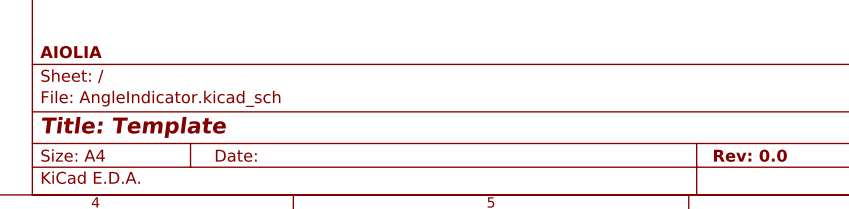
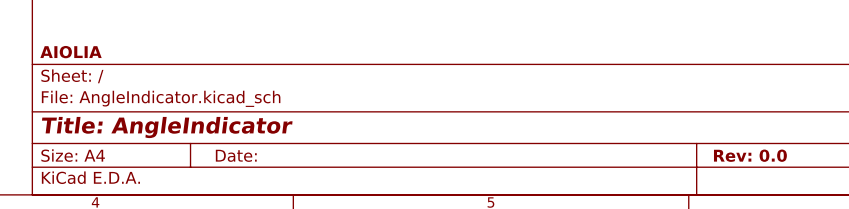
title block: Title: Template (134, 127) -> Title: AngleIndicator (167, 127)

